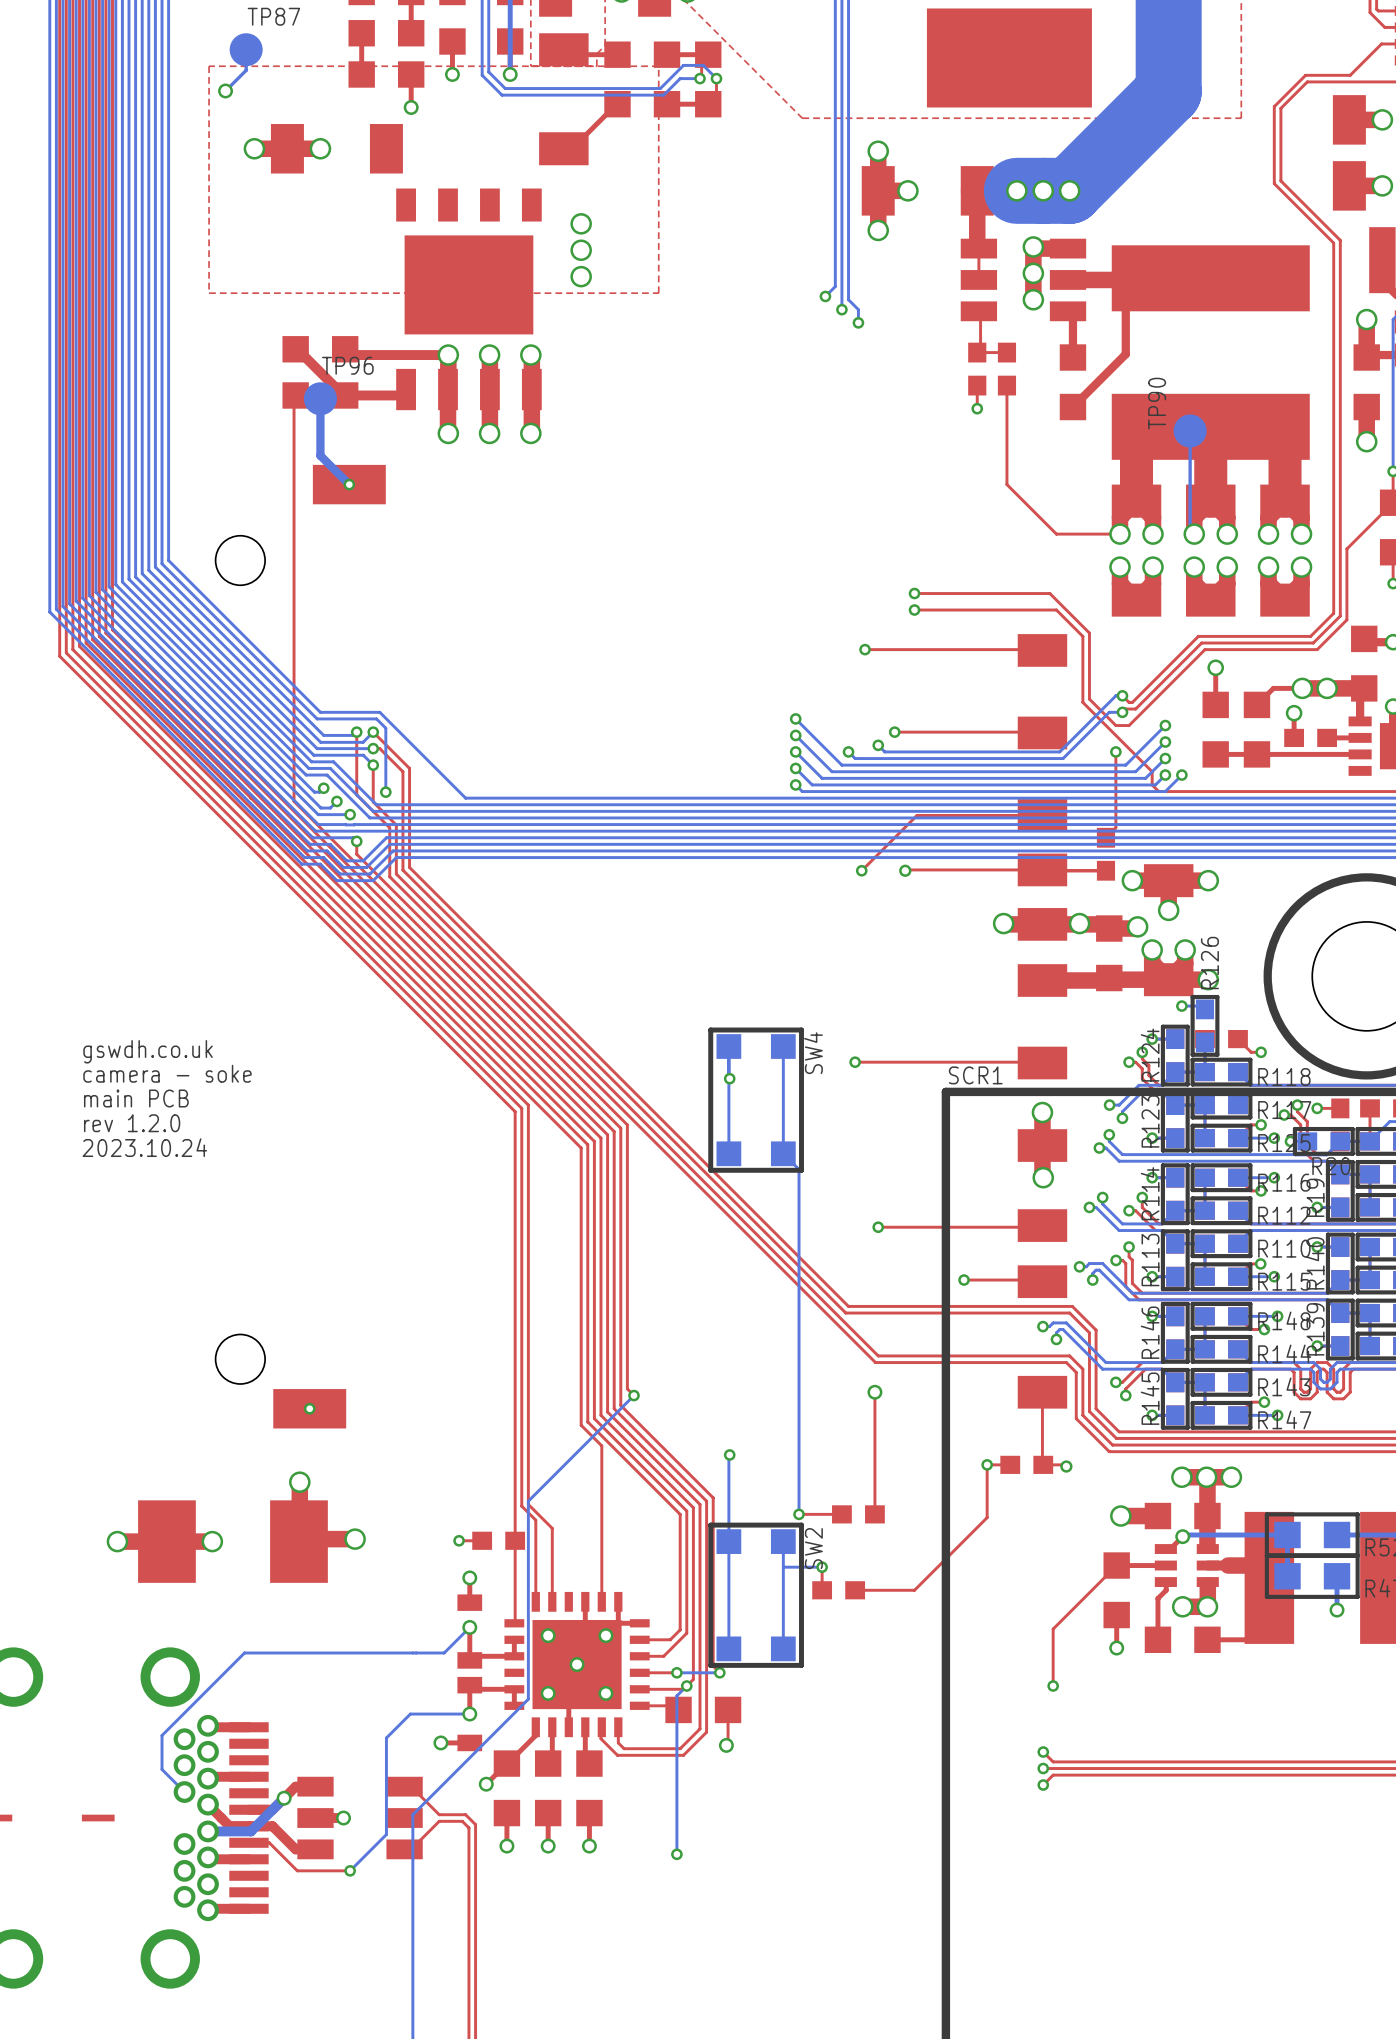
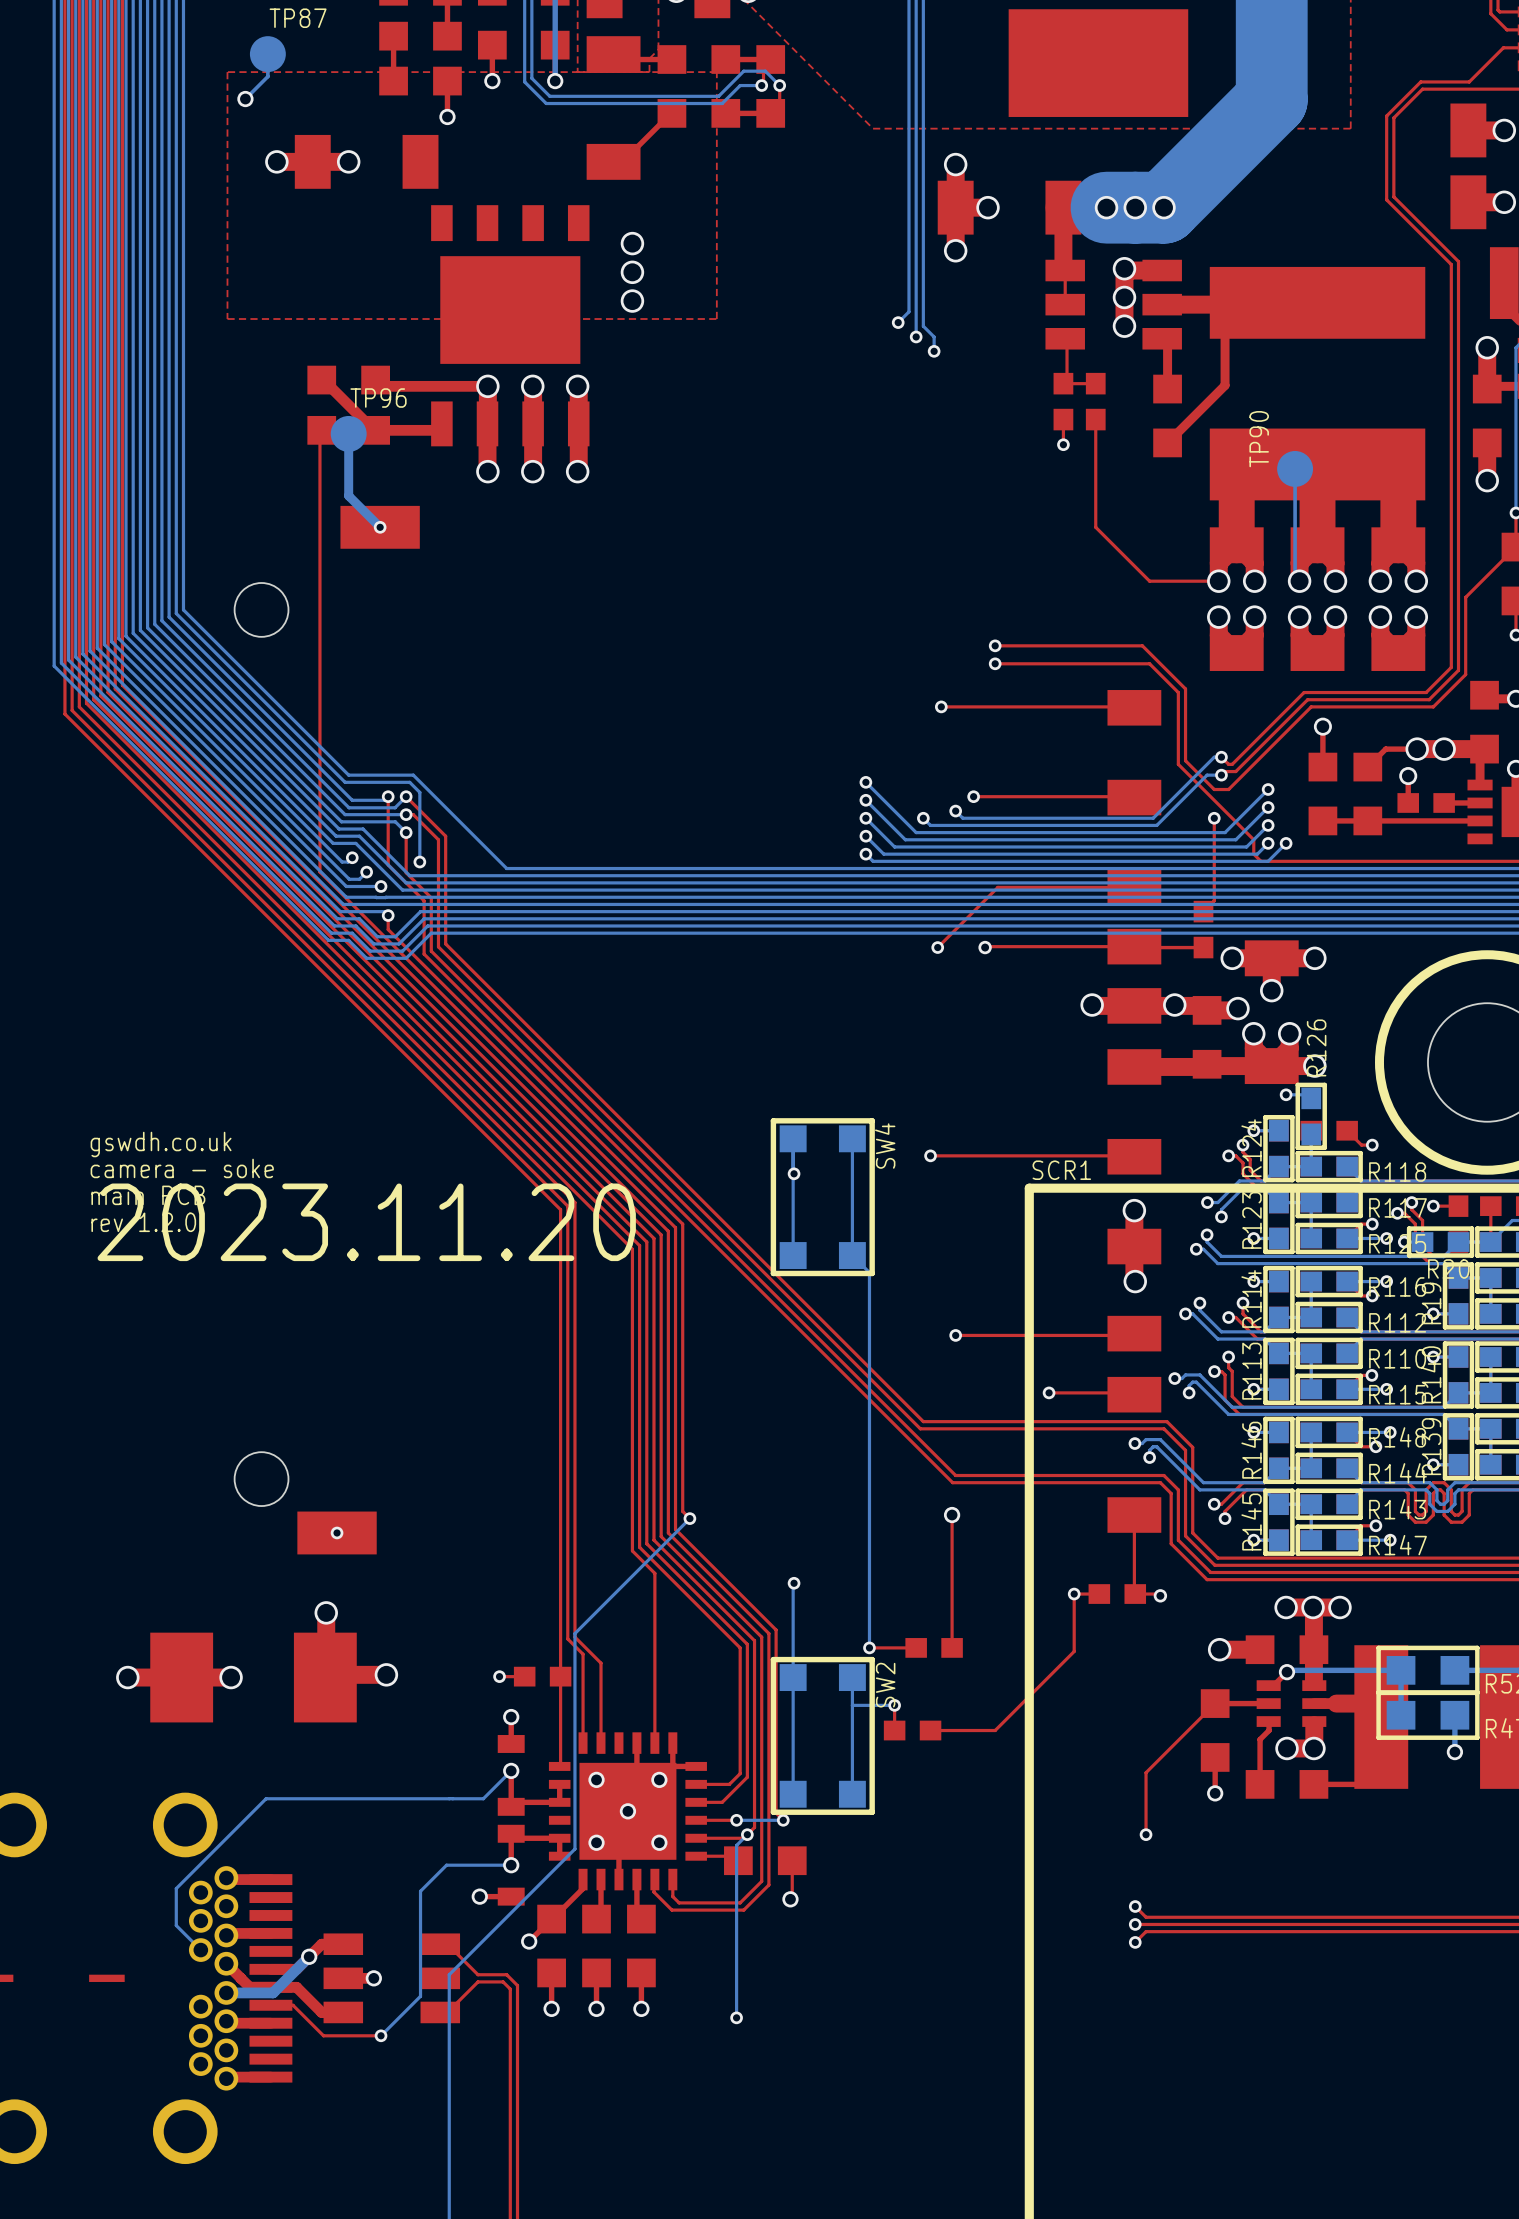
text: 2023.10.24 (144, 1147) -> 2023.11.20 (366, 1222)

